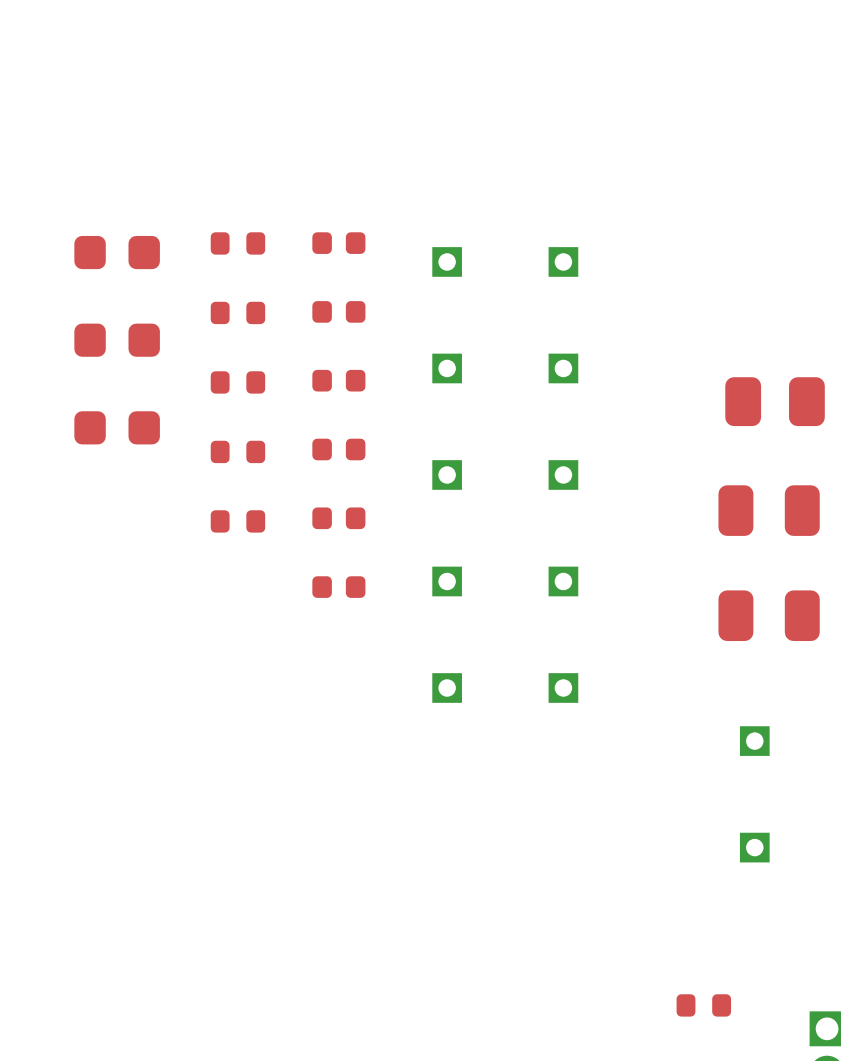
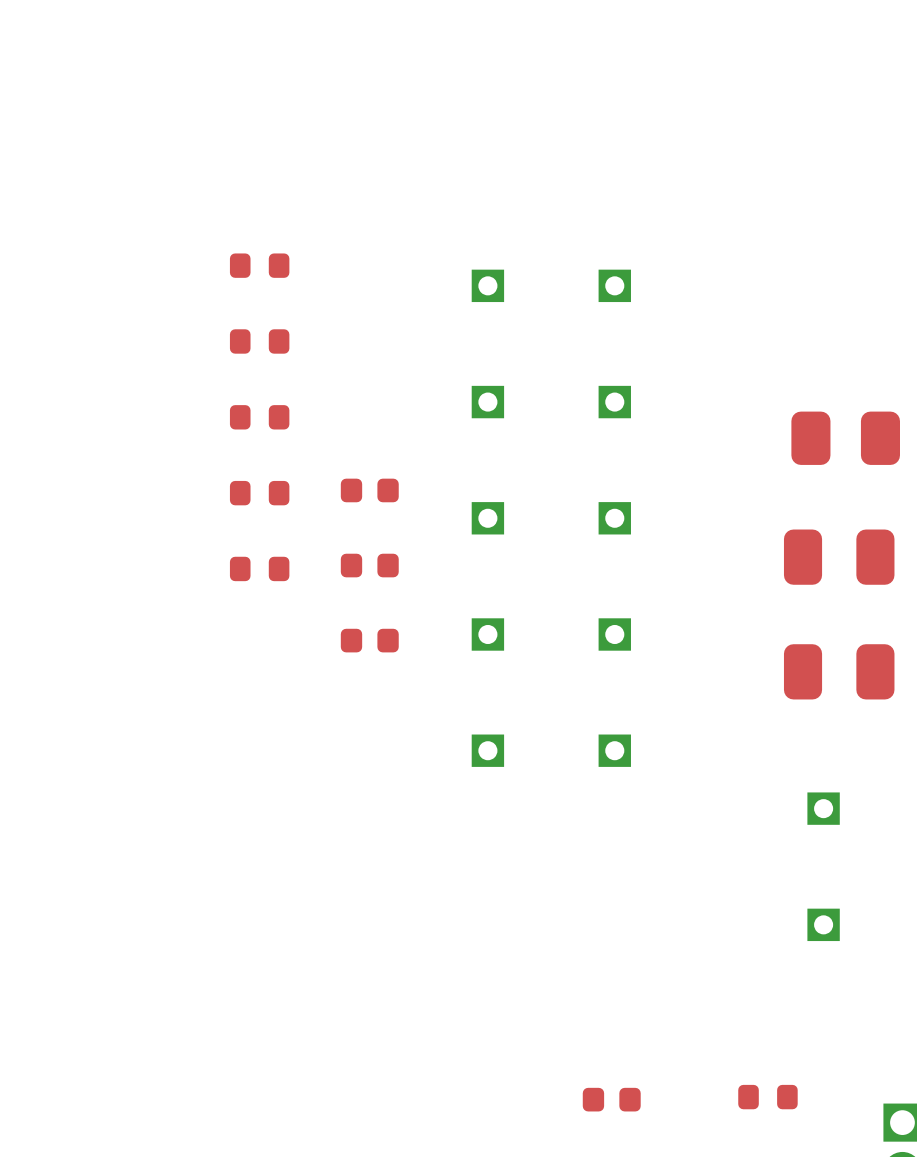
part: (338, 243) -> none
part: (117, 252) -> none
part: (338, 311) -> none
part: (117, 340) -> none
part: (338, 380) -> none
part: (117, 427) -> none
part: none -> (611, 1099)

